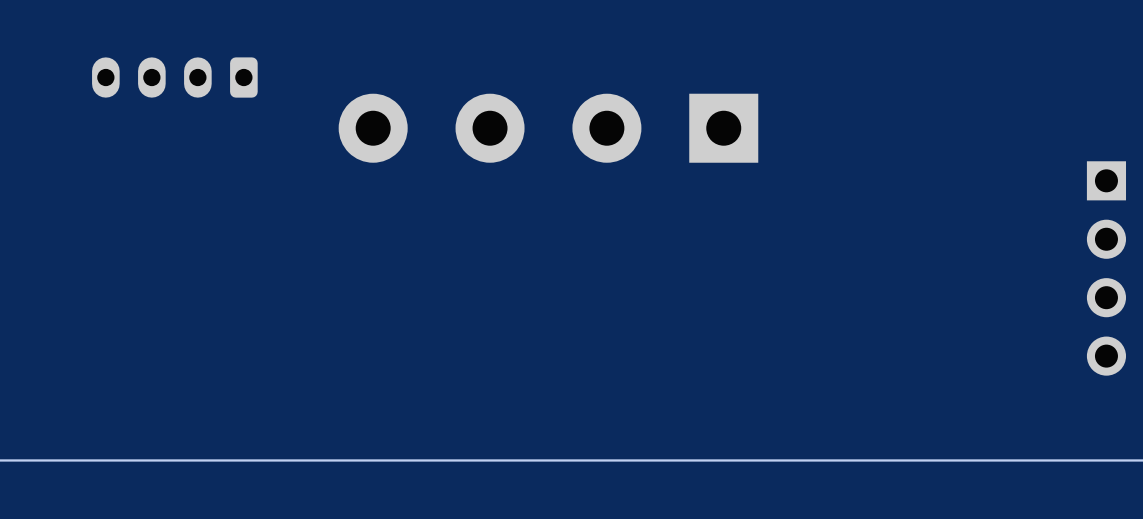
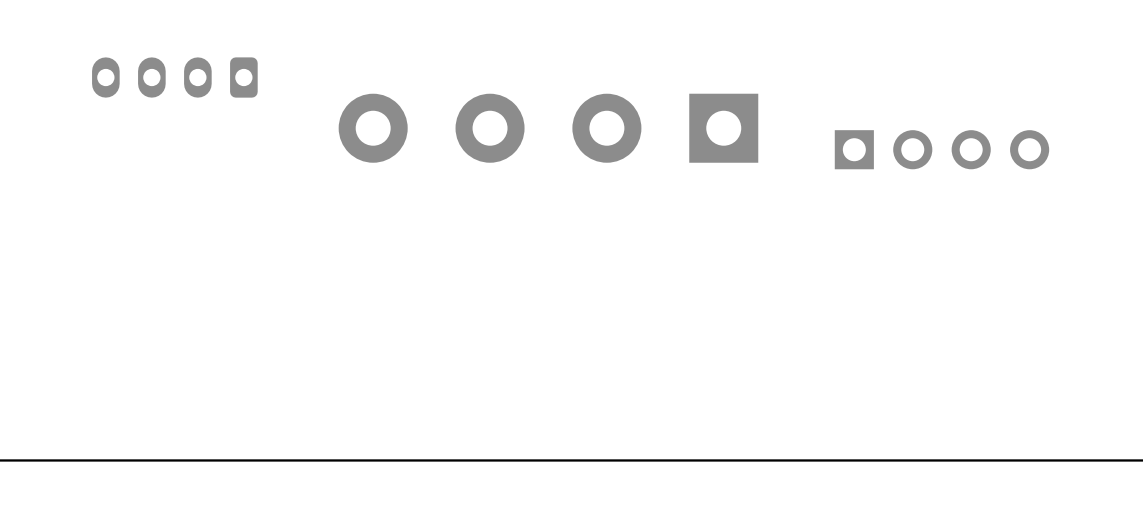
part rotation: 0° (1106, 268) -> 90° counterclockwise (941, 149)
part position: (1106, 268) -> (941, 149)

